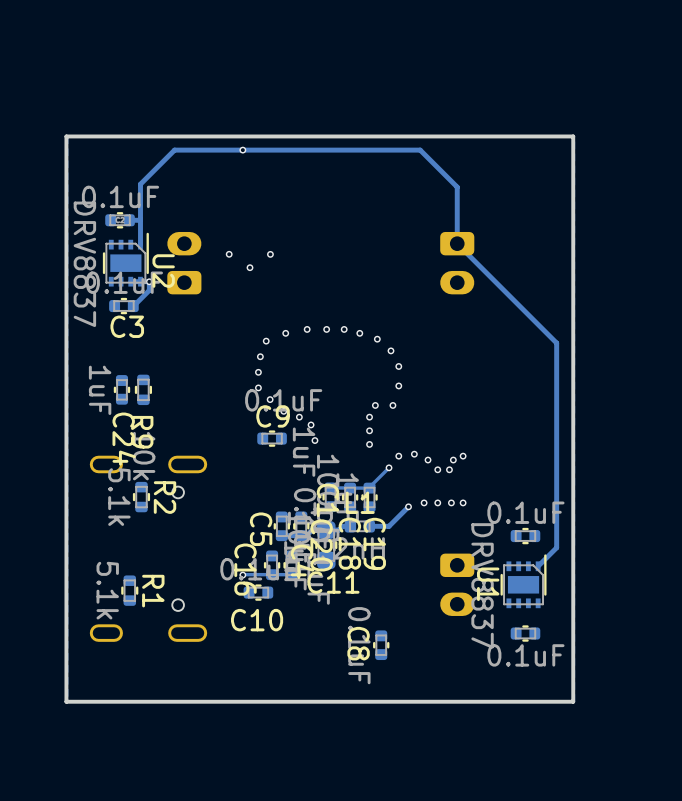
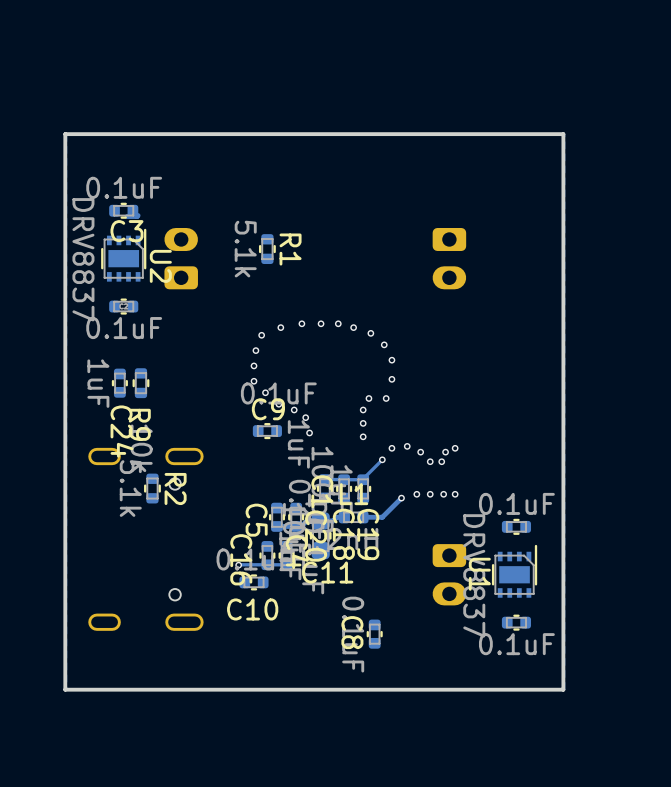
via: (242, 150) -> none
part value position: 0.1uF (120, 196) -> 0.1uF (124, 328)
part position: (120, 220) -> (123, 306)
track: (140, 244) (140, 184) (174, 150) (420, 150) (457, 187) (457, 243) (556, 343) (556, 547) (538, 566) -> none
via: (229, 254) -> none
via: (270, 254) -> none
via: (249, 267) -> none
track: (130, 281) (149, 281) (149, 290) (133, 306) -> none
via: (149, 281) -> none
C3 position: (123, 306) -> (123, 210)
R2 position: (141, 497) -> (152, 488)
R1 position: (129, 590) -> (267, 249)

